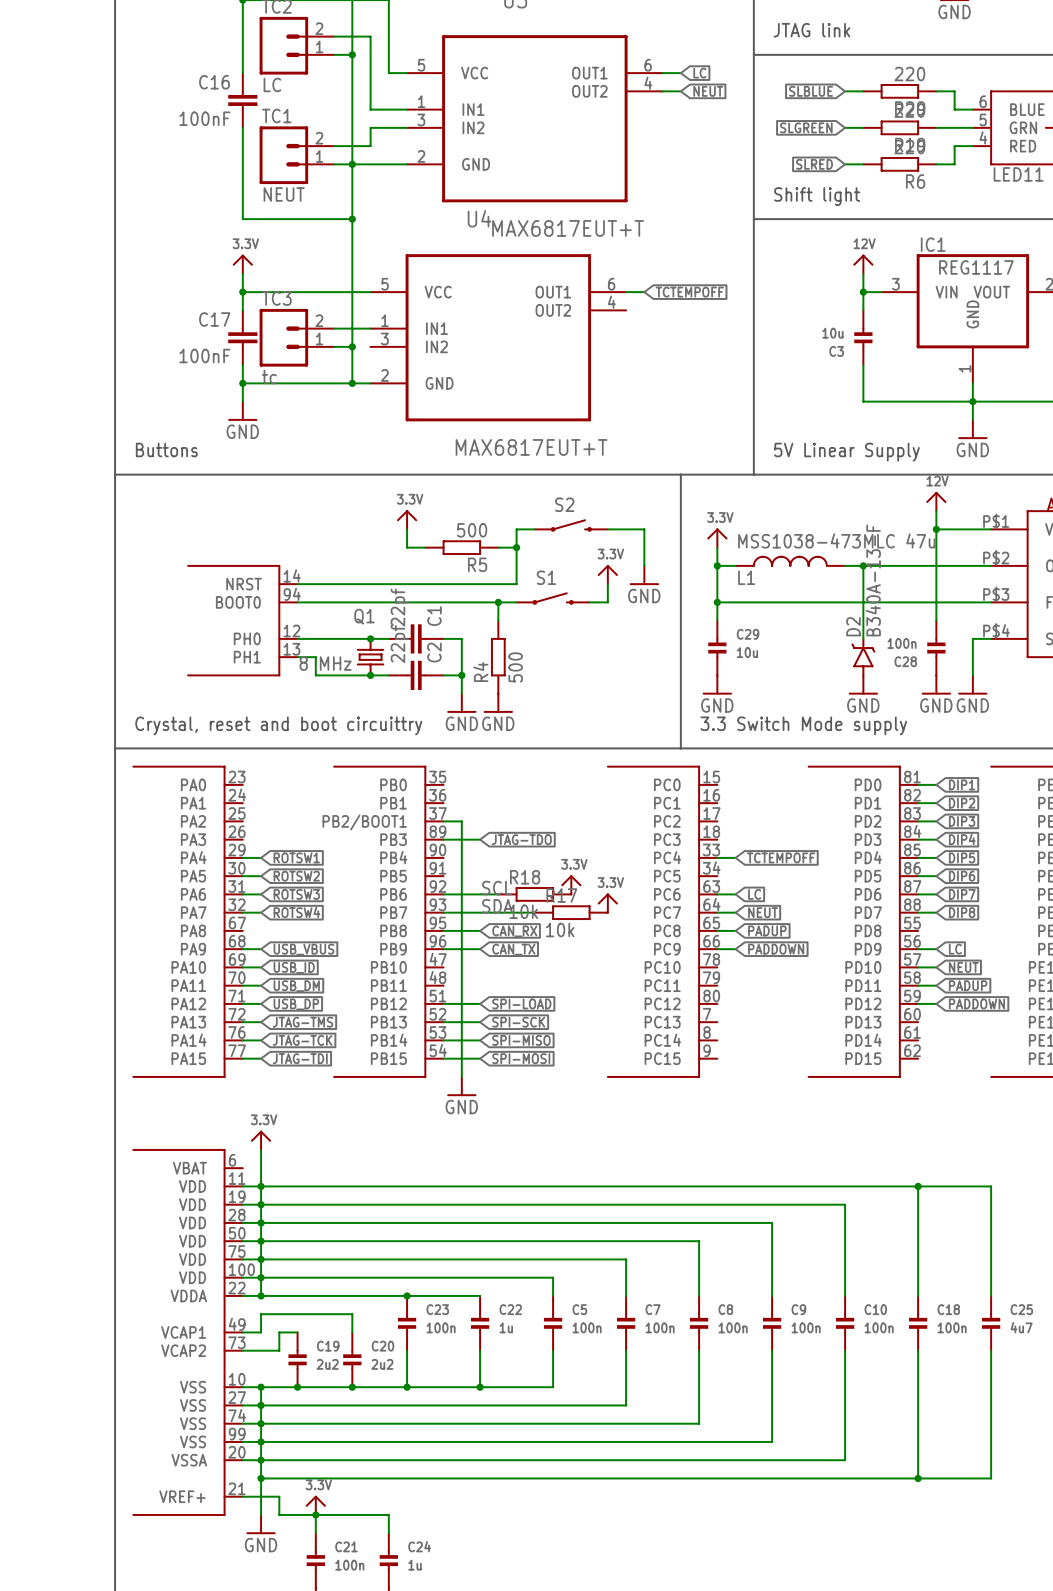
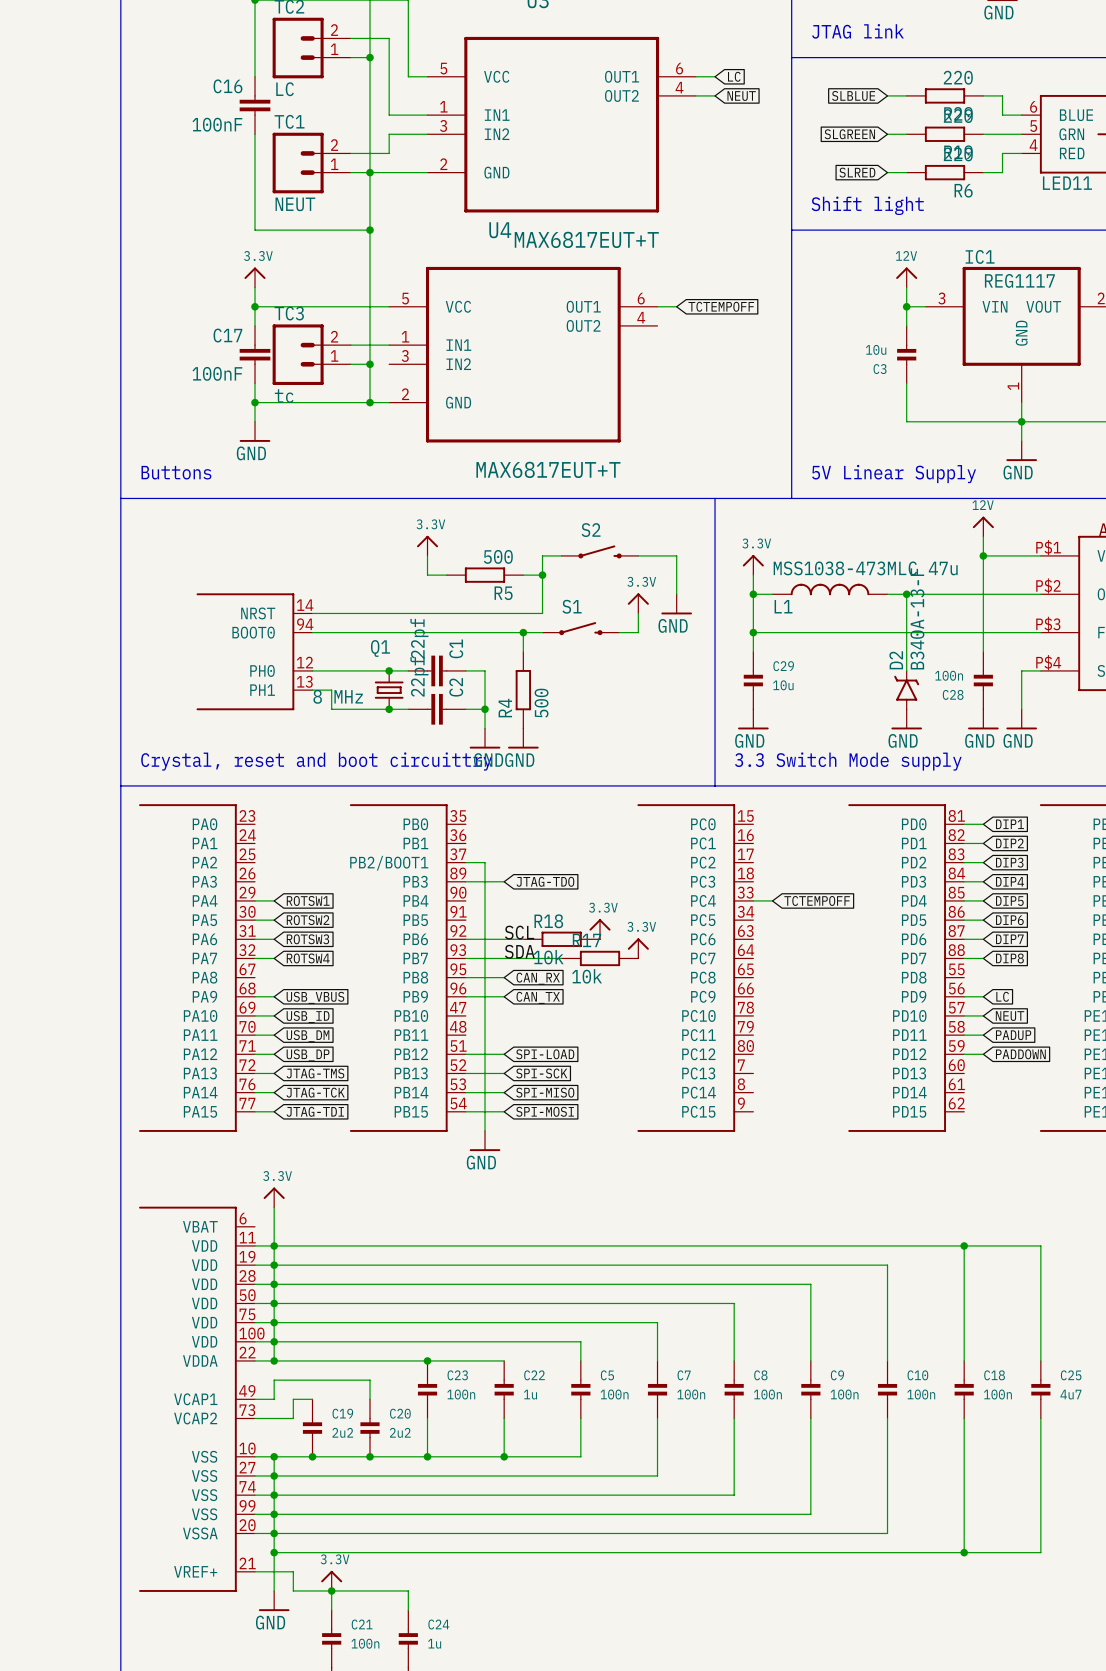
wire: (717, 894) (735, 894) -> none
global label: LC (754, 894) -> none
wire: (717, 912) (735, 912) -> none
global label: NEUT (763, 912) -> none
wire: (717, 930) (735, 930) -> none
global label: PADUP (767, 930) -> none
wire: (717, 949) (735, 949) -> none
global label: PADDOWN (776, 949) -> none

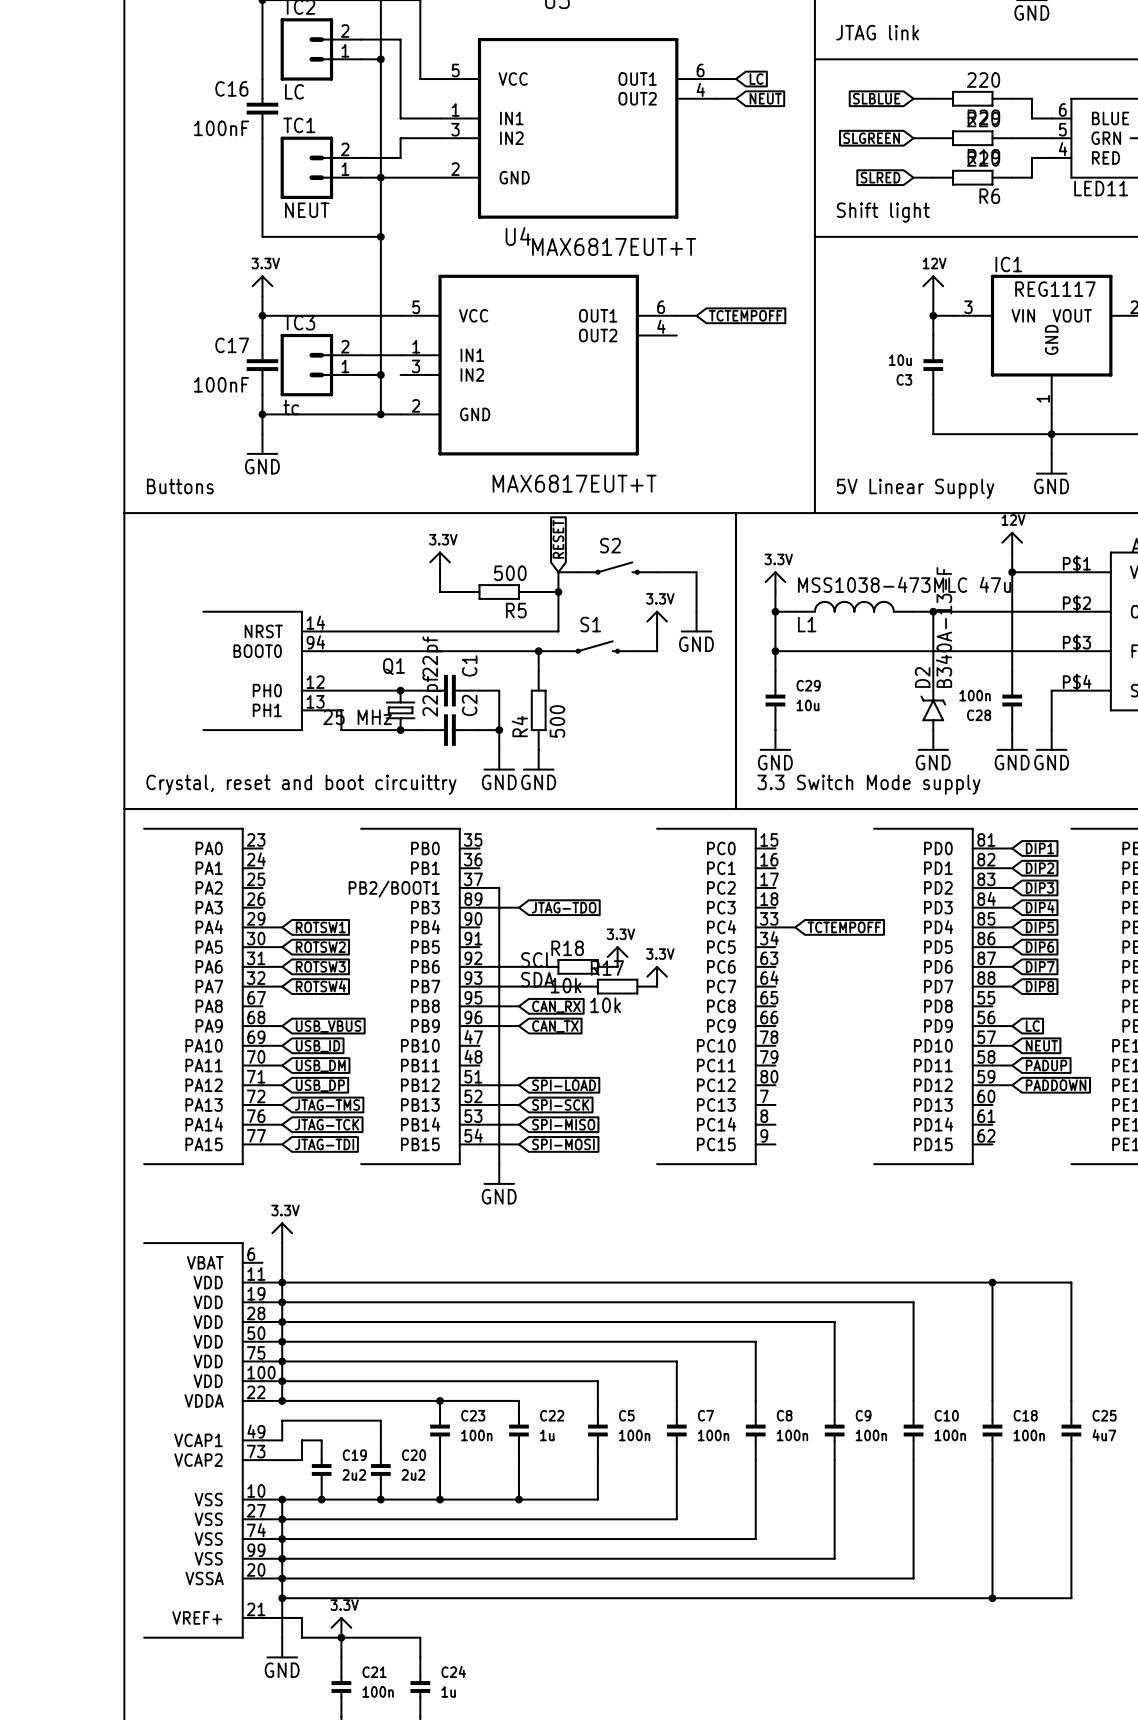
global label: none -> RESET (558, 539)
Q1 value: 8 MHz (338, 696) -> 25 MHz (357, 717)

